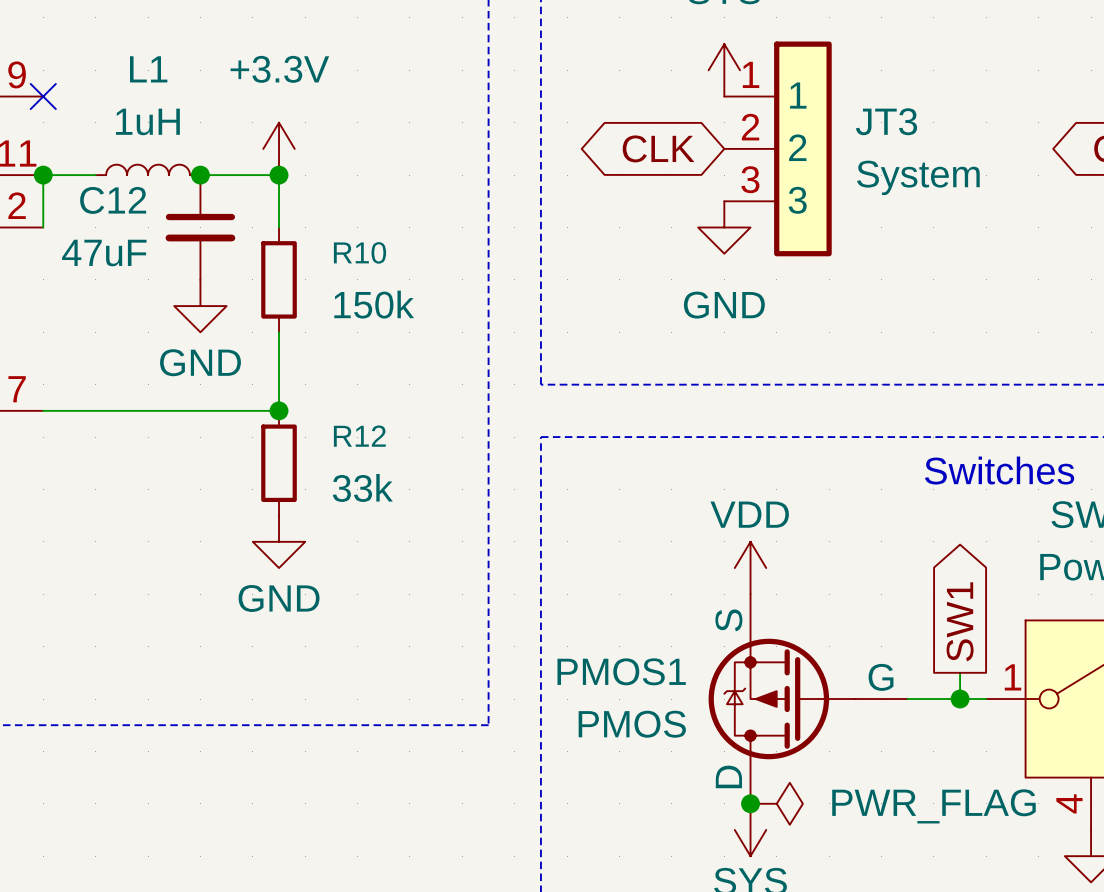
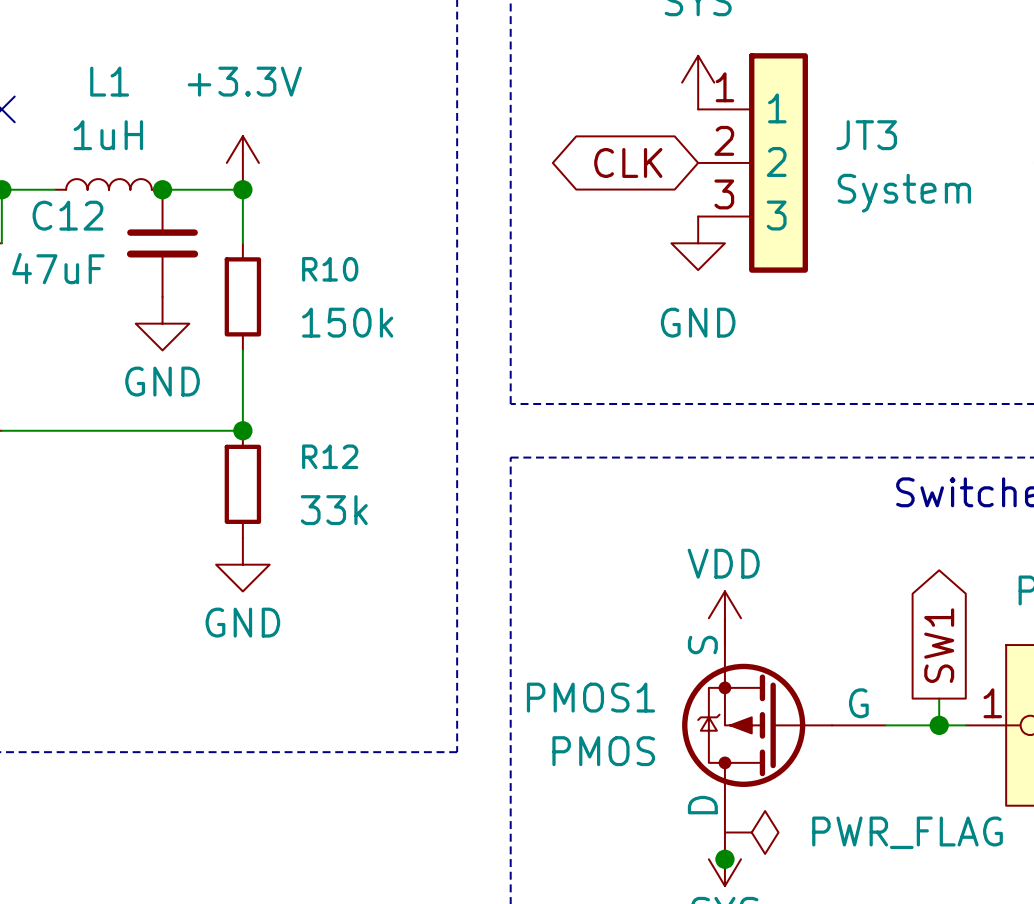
power symbol position: VDD (750, 568) -> VDD (724, 618)
junction position: (750, 803) -> (724, 859)

